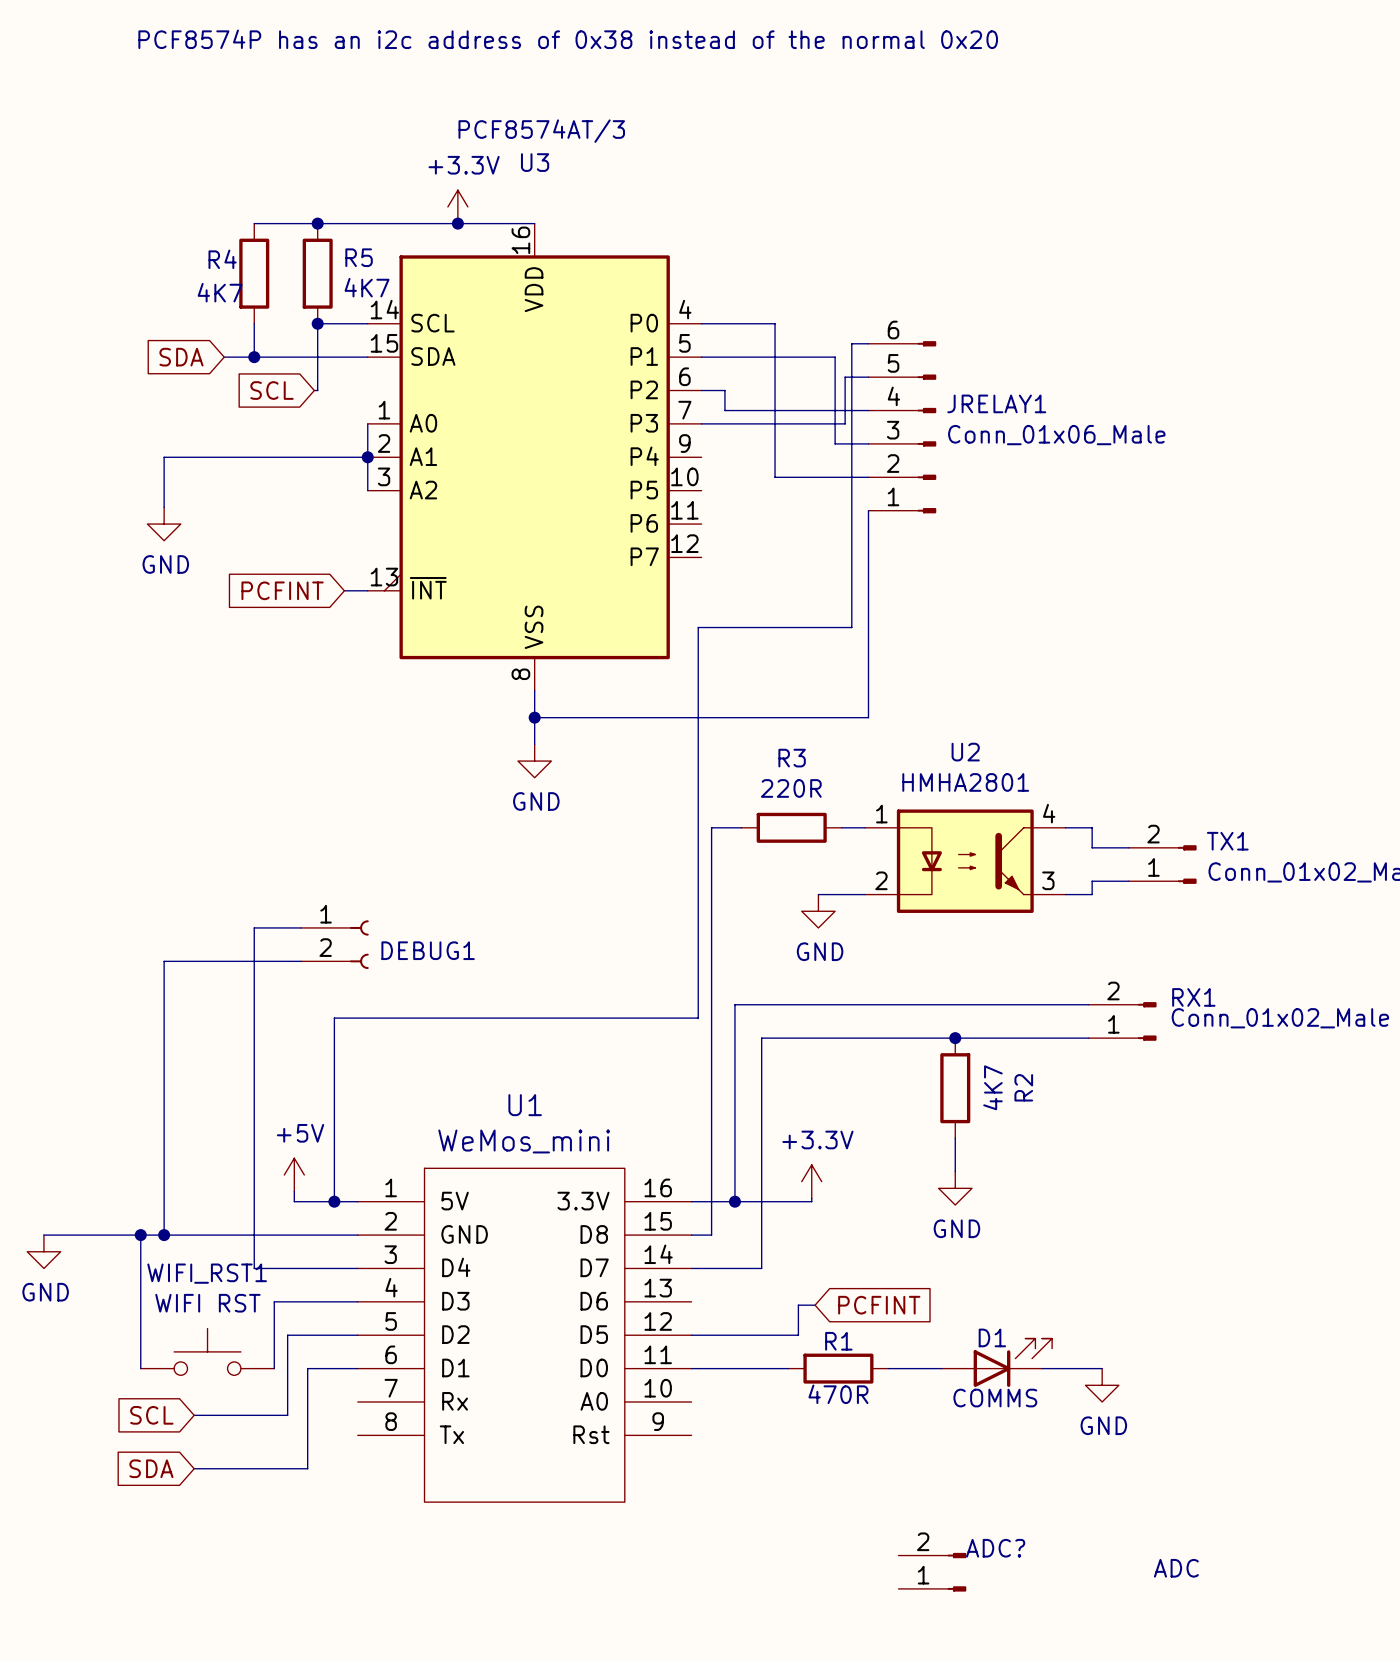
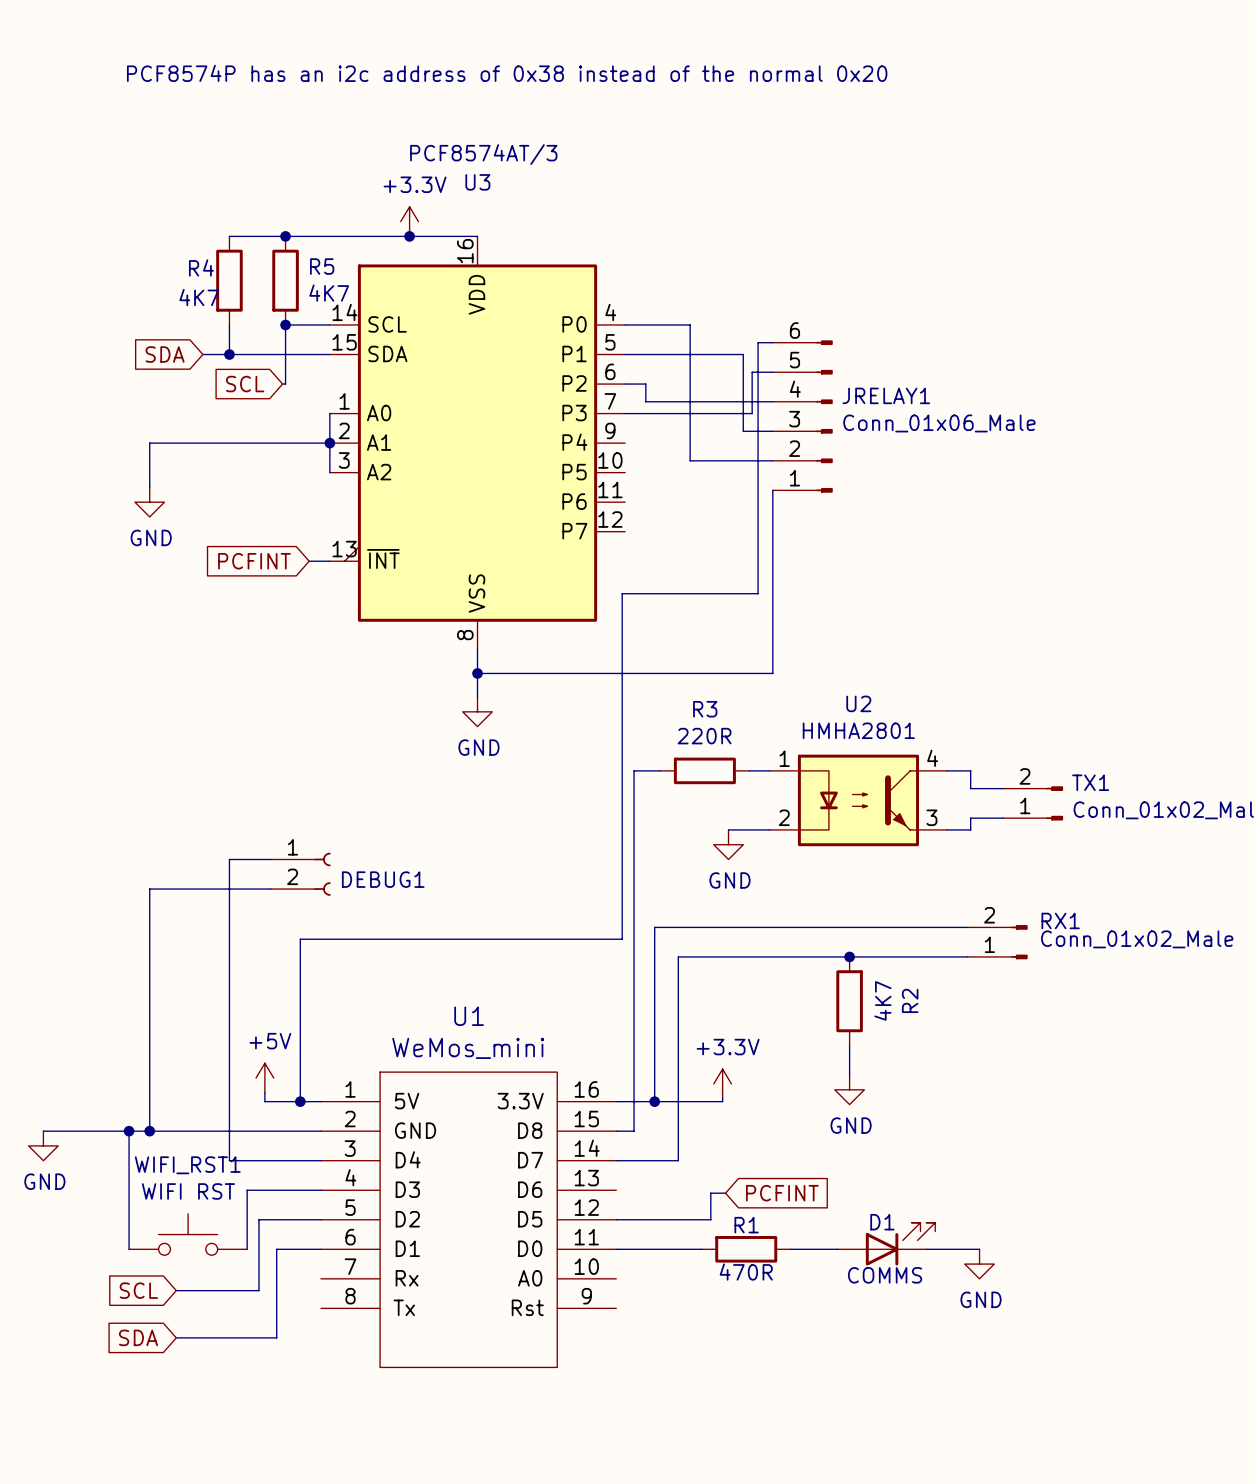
ADC?: ADC (932, 1572) -> none

